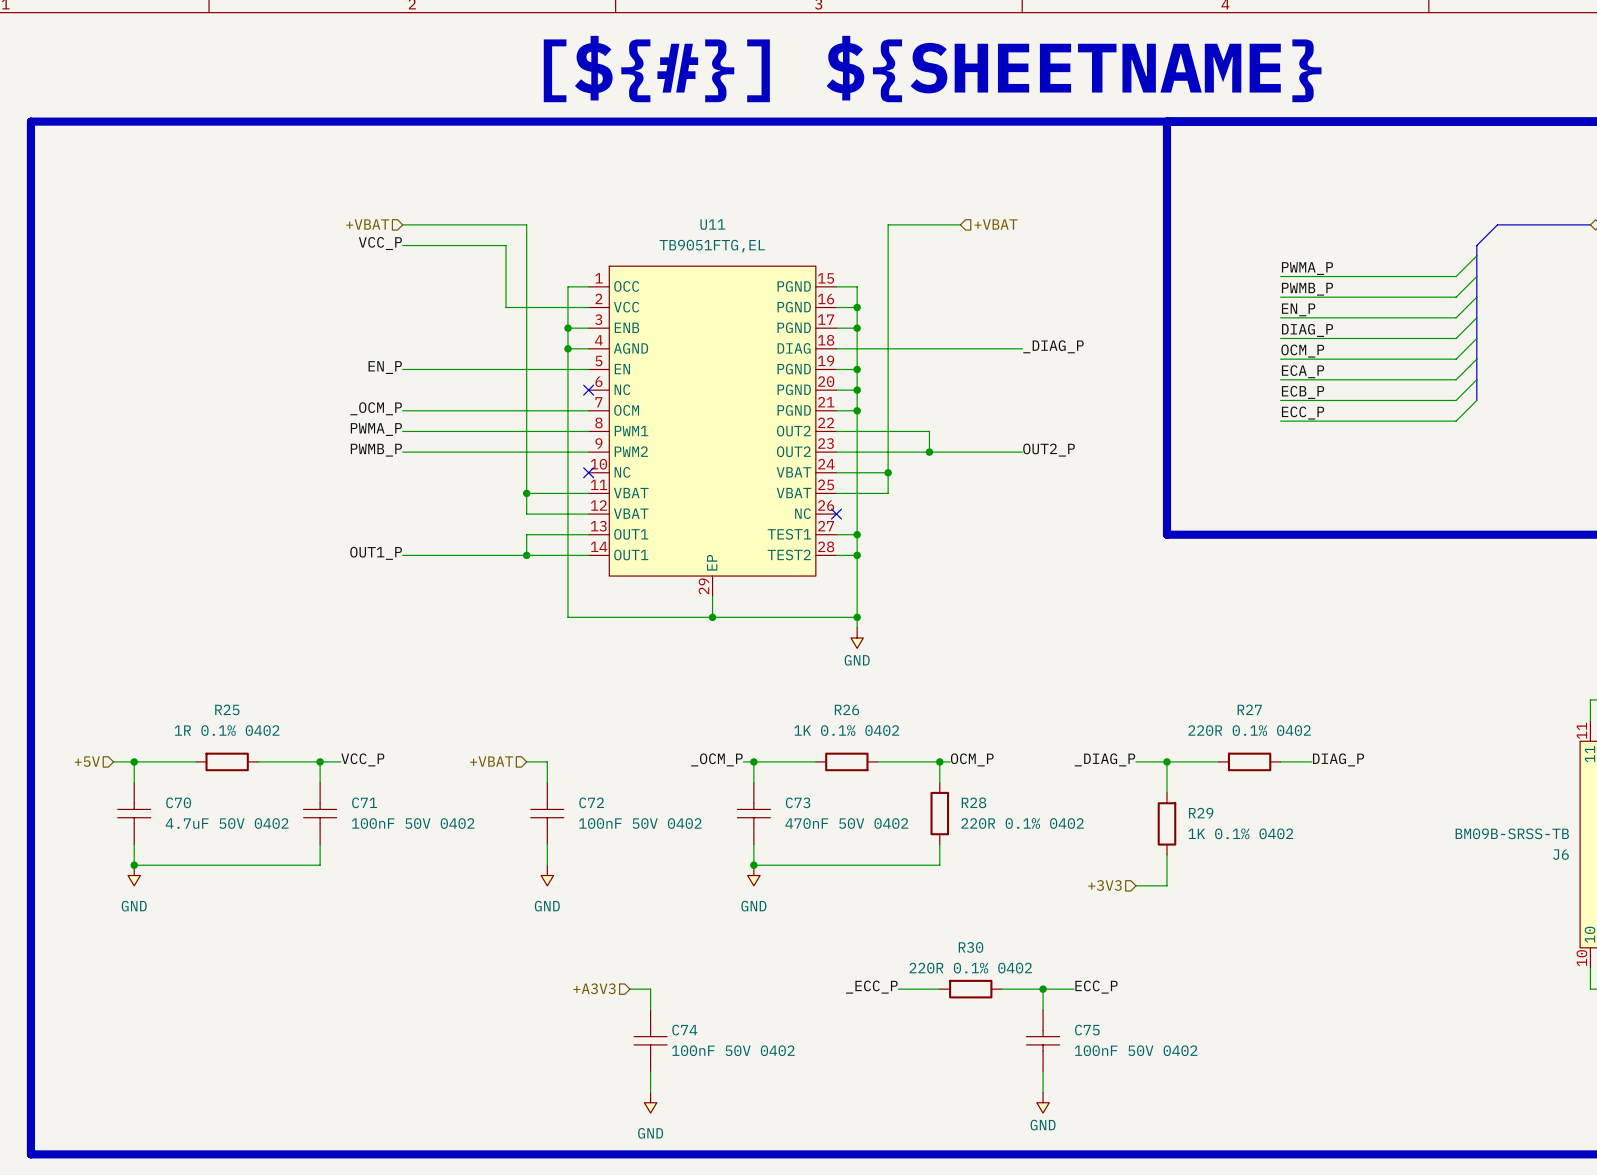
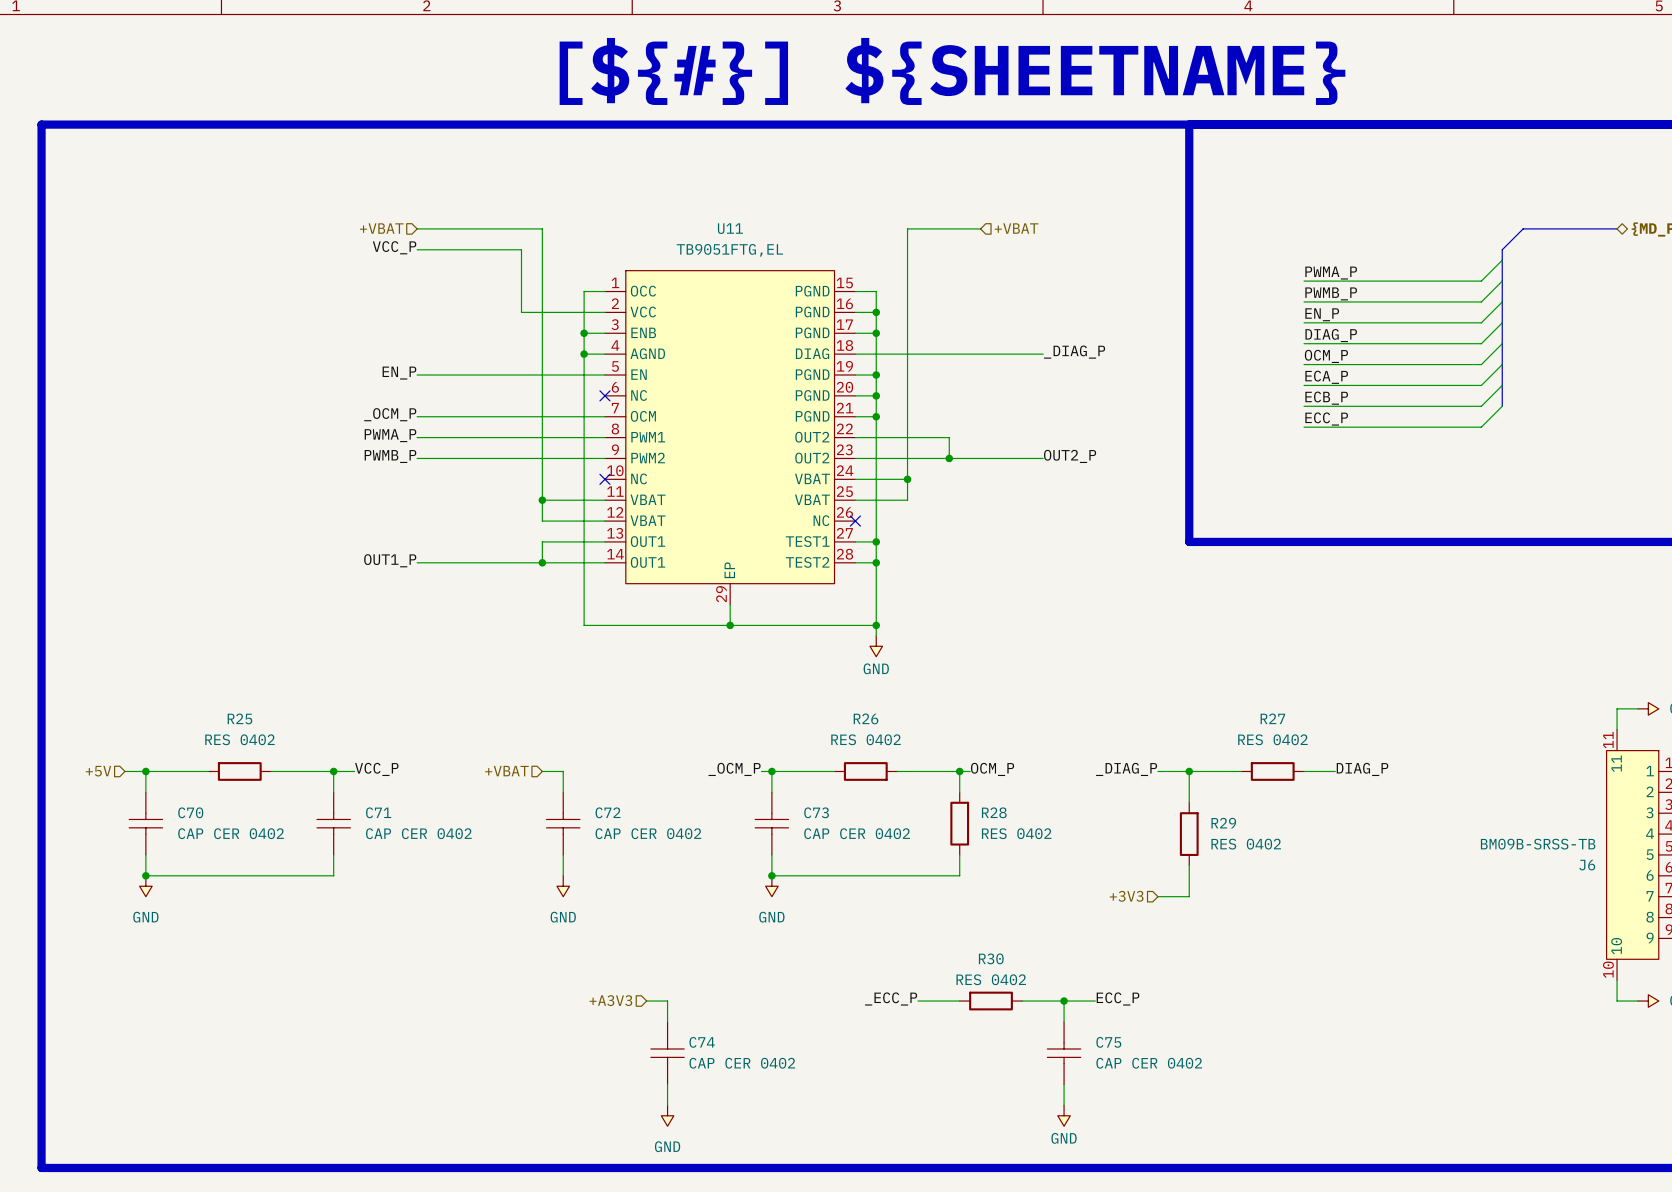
R25 value: 1R 0.1% 0402 (227, 730) -> RES 0402 (239, 739)
R26 value: 1K 0.1% 0402 (846, 730) -> RES 0402 (866, 739)
R27 value: 220R 0.1% 0402 (1249, 730) -> RES 0402 (1272, 739)
C70 value: 4.7uF 50V 0402 (227, 823) -> CAP CER 0402 (231, 833)
C71 value: 100nF 50V 0402 (413, 823) -> CAP CER 0402 (418, 833)
C72 value: 100nF 50V 0402 (640, 823) -> CAP CER 0402 (648, 833)
C73 value: 470nF 50V 0402 (846, 823) -> CAP CER 0402 (857, 833)
R28 value: 220R 0.1% 0402 (1022, 823) -> RES 0402 (1016, 833)
R29 value: 1K 0.1% 0402 (1240, 833) -> RES 0402 (1246, 844)
R30 value: 220R 0.1% 0402 (970, 968) -> RES 0402 (991, 979)
C74 value: 100nF 50V 0402 (733, 1050) -> CAP CER 0402 (742, 1063)
C75 value: 100nF 50V 0402 (1136, 1050) -> CAP CER 0402 (1149, 1063)

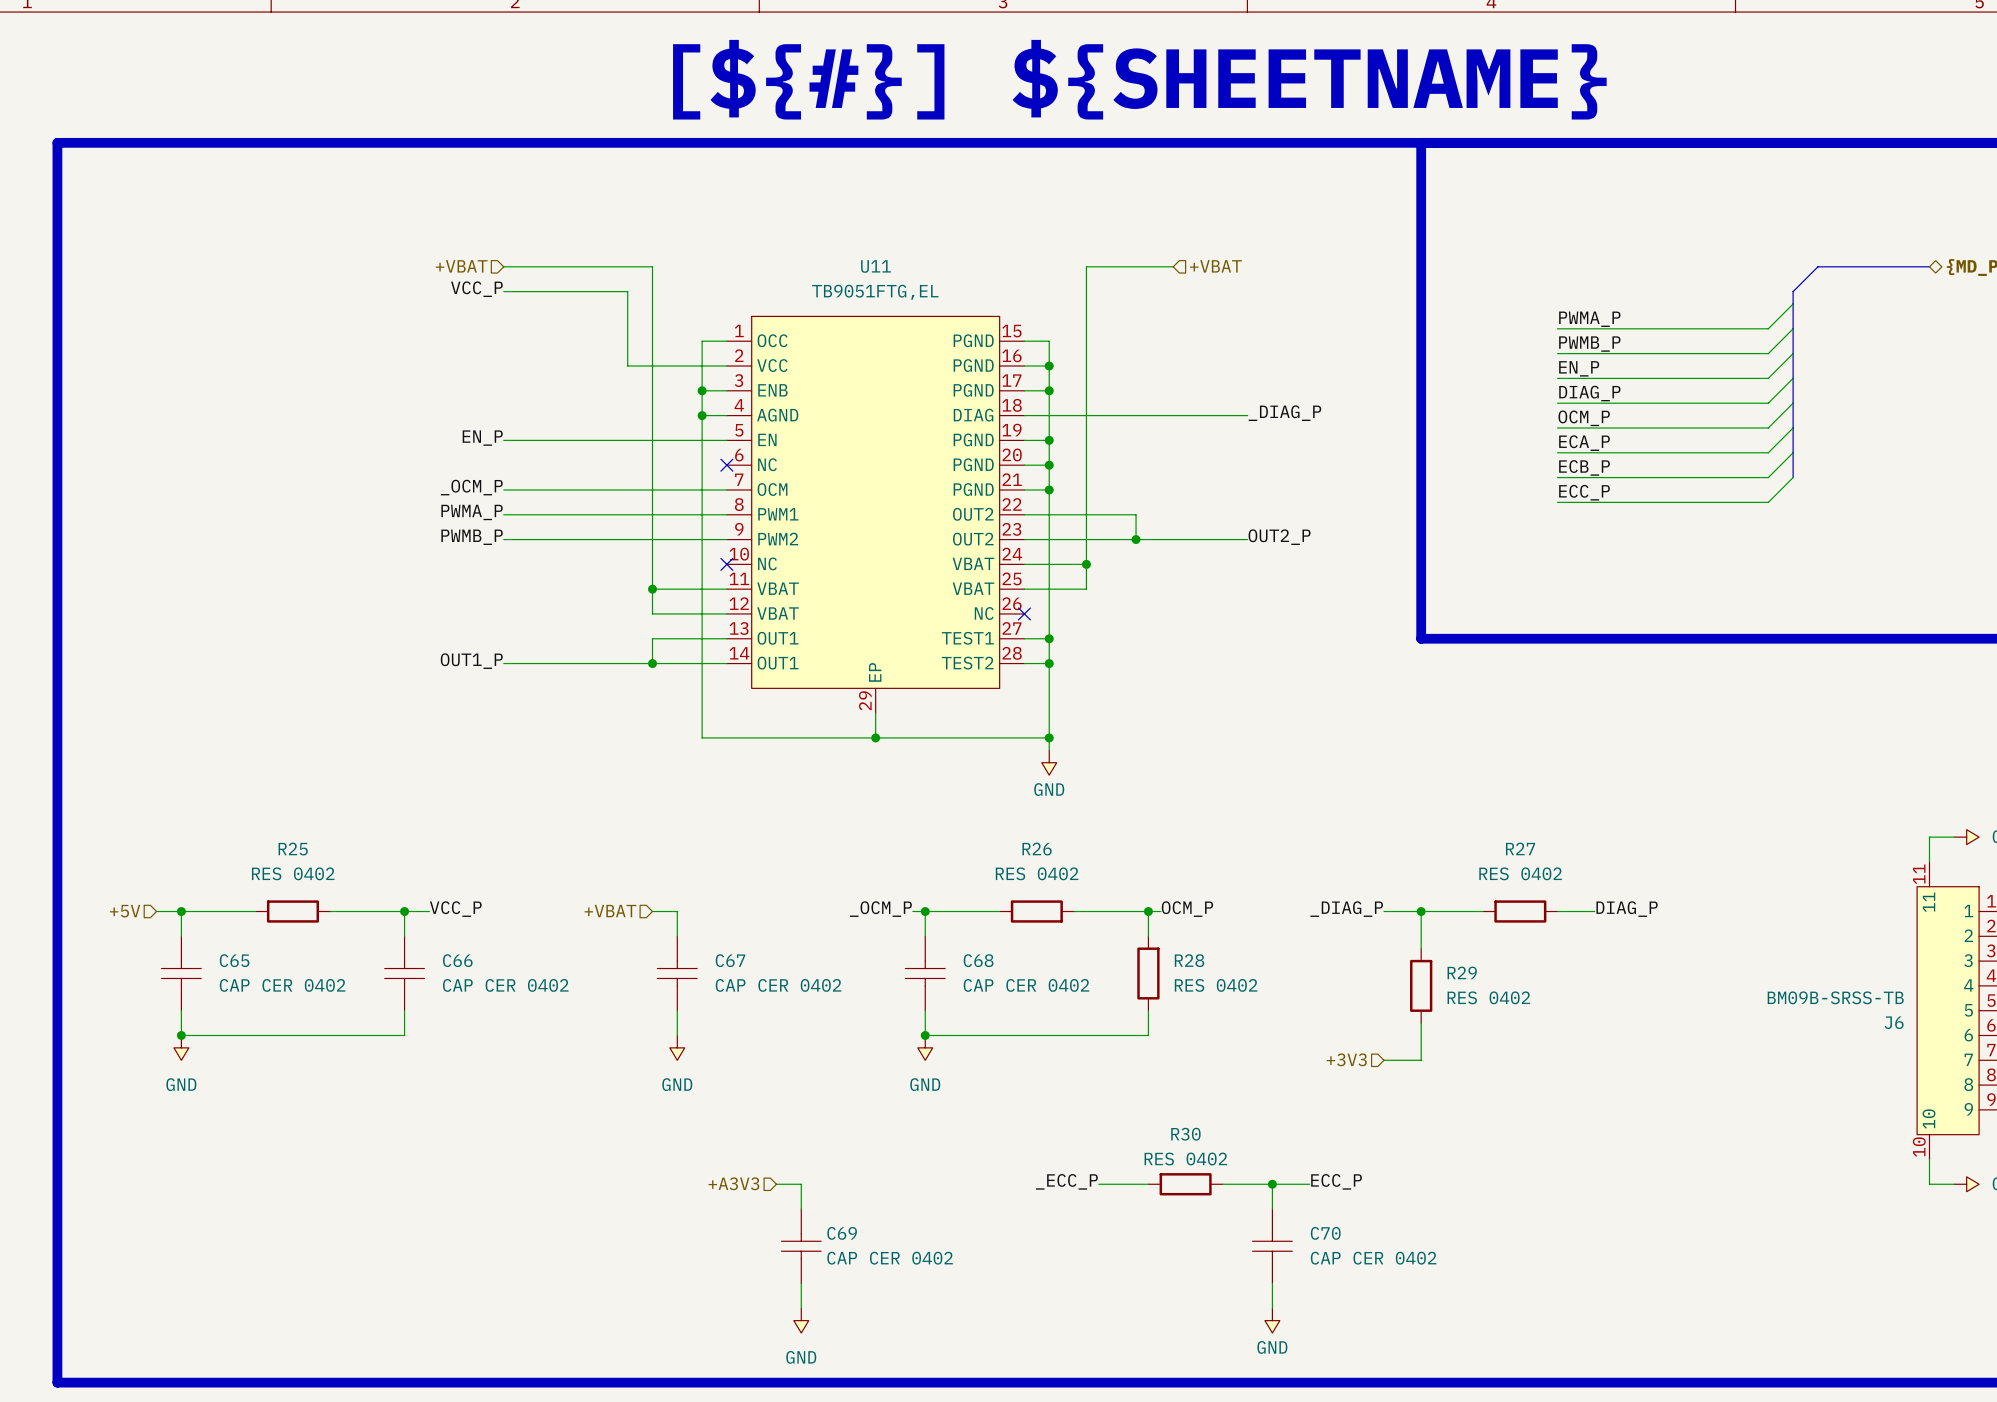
C70 name: C70 (190, 812) -> C65 (234, 960)
C71 name: C71 (378, 812) -> C66 (457, 960)
C72 name: C72 (608, 812) -> C67 (730, 960)
C73 name: C73 (816, 812) -> C68 (978, 960)
C74 name: C74 (702, 1042) -> C69 (842, 1233)
C75 name: C75 (1108, 1042) -> C70 (1325, 1233)

